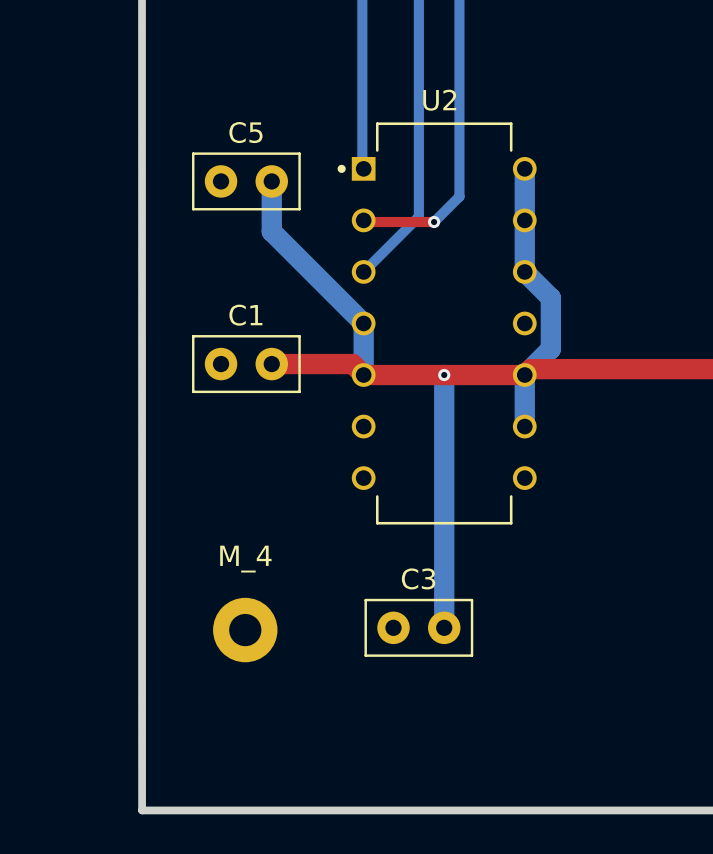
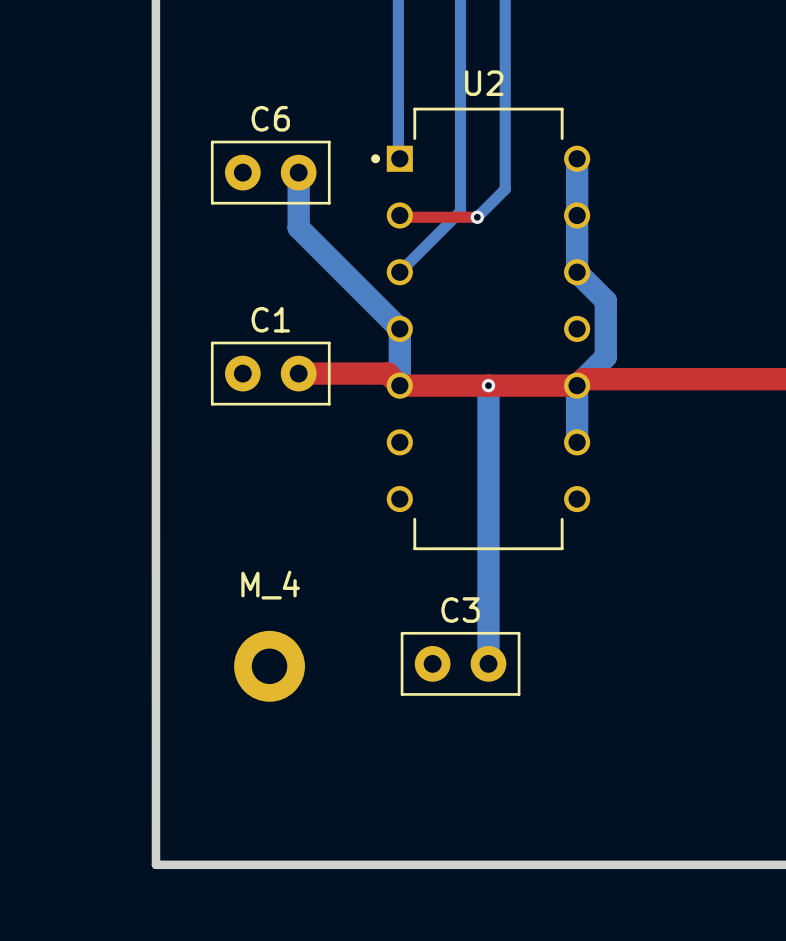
C5 name: C5 (245, 132) -> C6 (270, 118)

